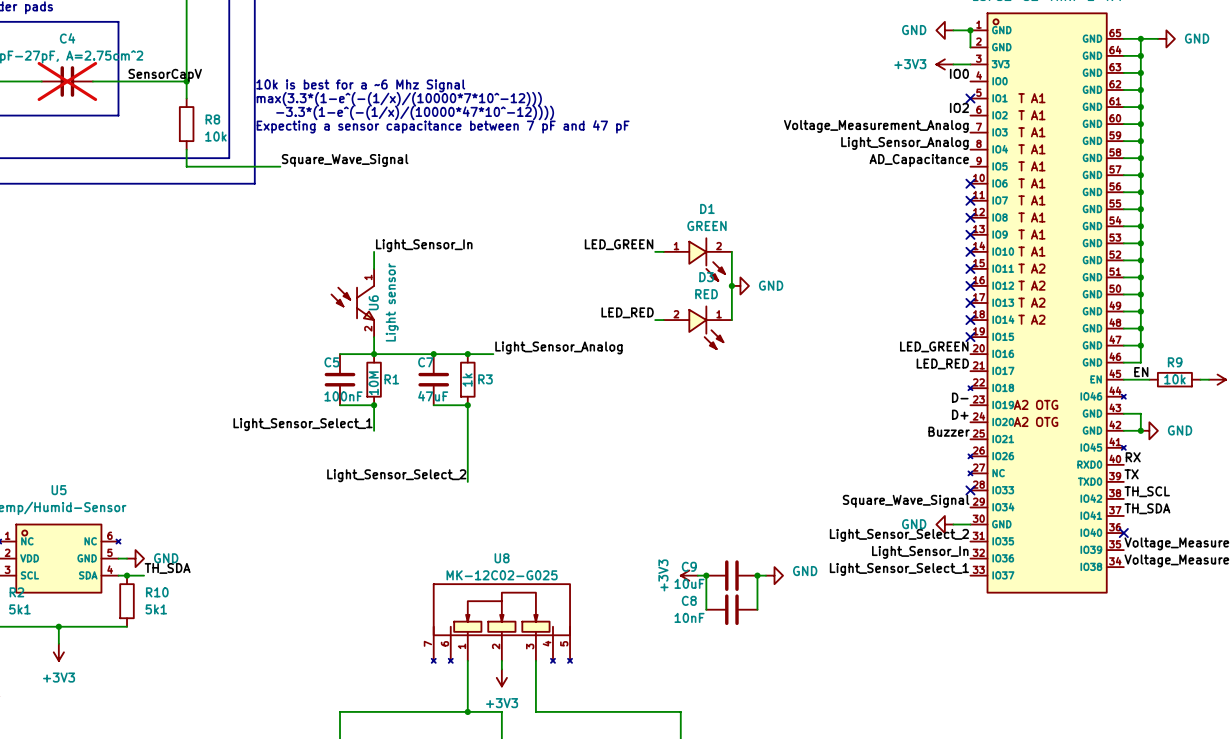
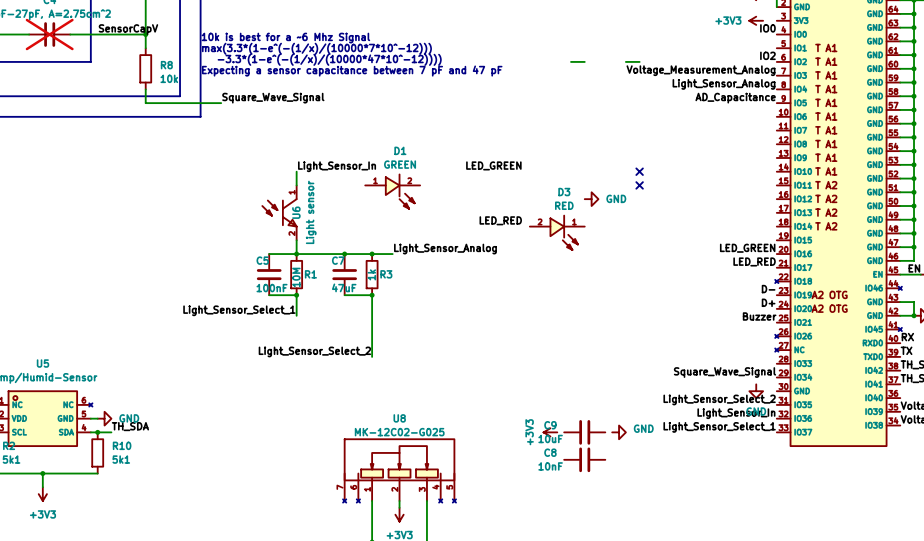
wire: (953, 64) (970, 64) -> none
no-connect mark: (970, 98) -> none
wire: none -> (571, 61) (584, 61)
wire: none -> (625, 61) (639, 61)
no-connect mark: (970, 183) -> none
no-connect mark: (970, 200) -> none
no-connect mark: (970, 217) -> none
no-connect mark: (970, 234) -> none
wire: (655, 251) (663, 251) -> none
wire: (731, 251) (731, 320) -> none
no-connect mark: none -> (639, 171)
no-connect mark: (970, 251) -> none
D1 position: (697, 259) -> (392, 191)
no-connect mark: none -> (639, 185)
no-connect mark: (970, 268) -> none
junction: (731, 285) -> none
no-connect mark: (970, 285) -> none
no-connect mark: (970, 303) -> none
wire: (655, 320) (663, 320) -> none
no-connect mark: (970, 320) -> none
no-connect mark: (970, 337) -> none
no-connect mark: (970, 490) -> none
power symbol rotation: 0° (944, 524) -> 90° counterclockwise (756, 391)
wire: (953, 524) (970, 524) -> none
no-connect mark: (1123, 533) -> none
wire: (697, 575) (706, 575) (706, 609) -> none
junction: (706, 575) -> none
junction: (757, 575) -> none
wire: (765, 575) (757, 575) (757, 609) -> none

